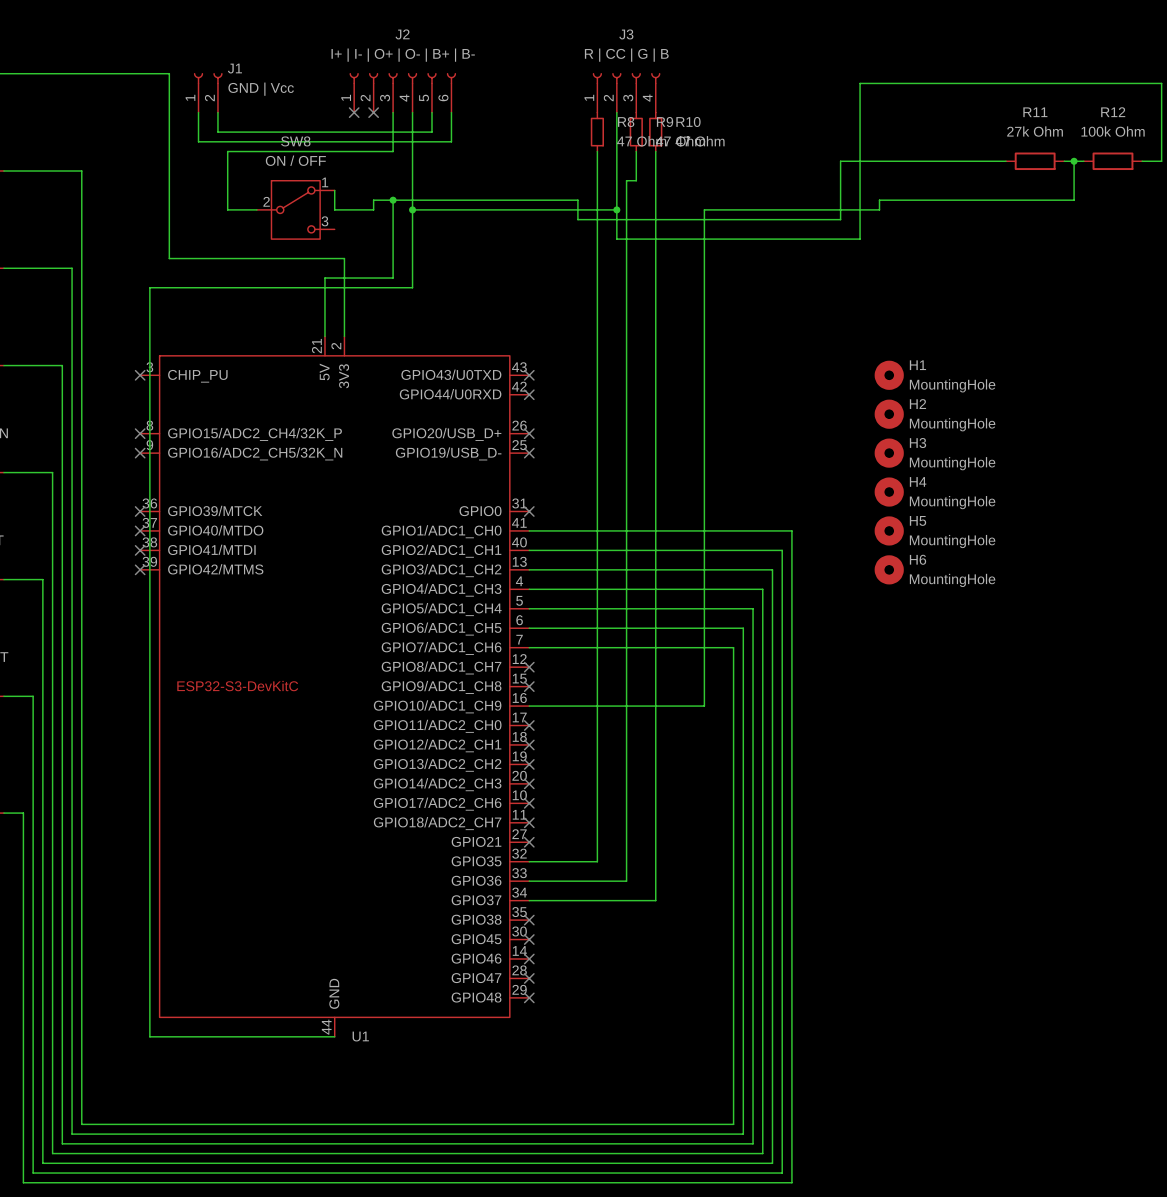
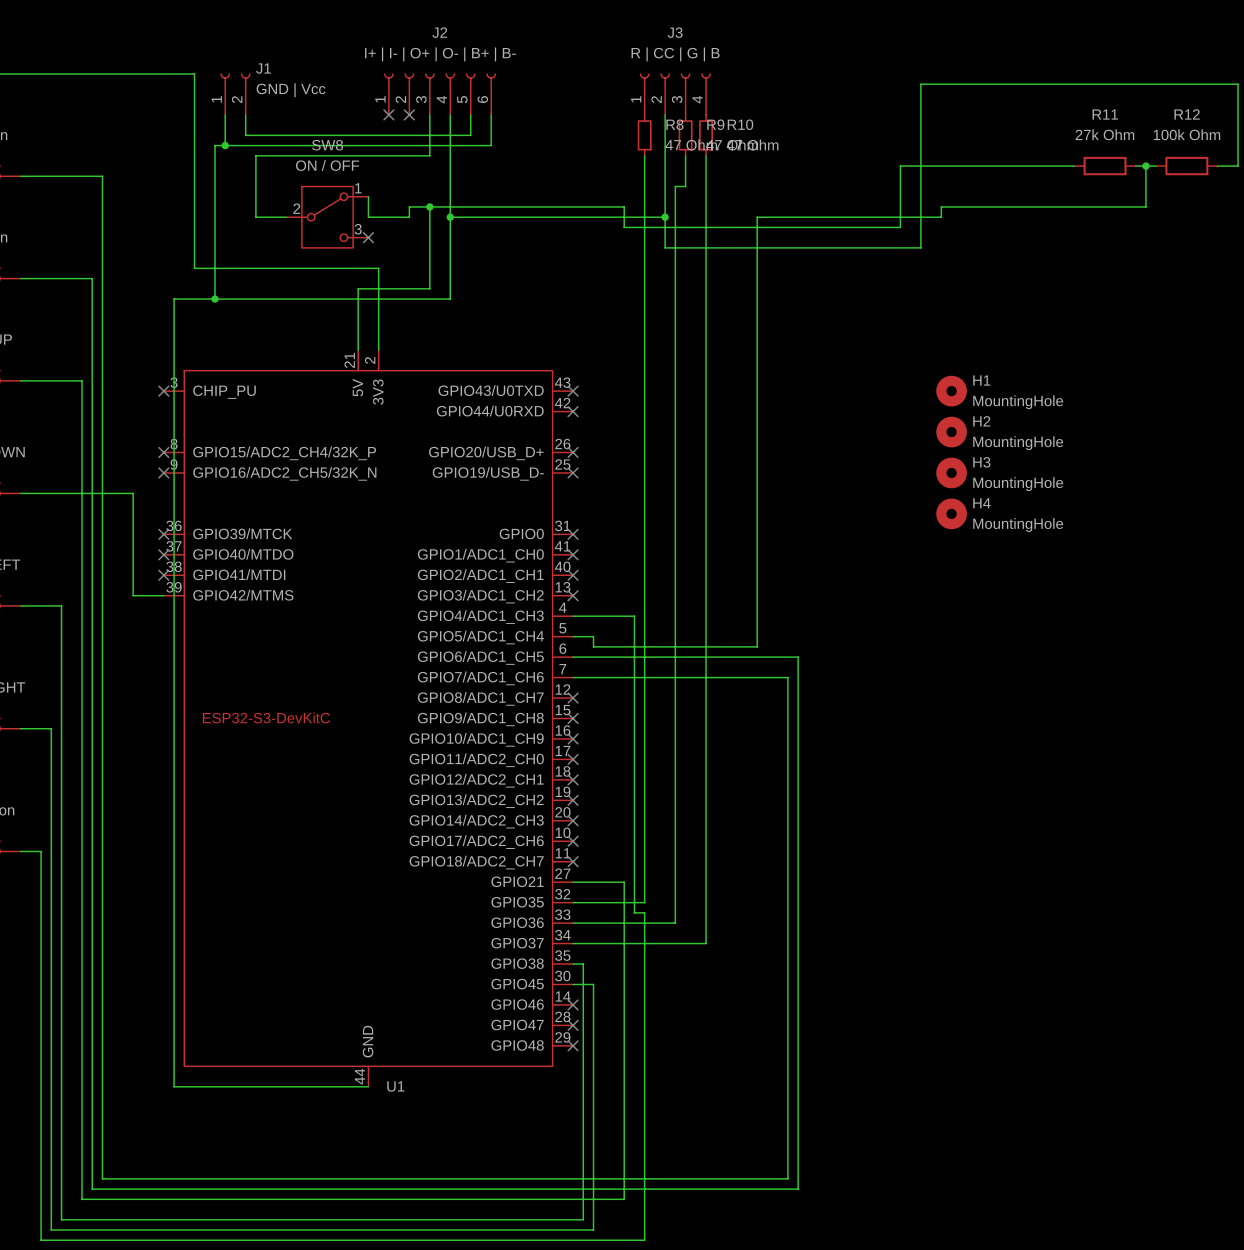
wire: none -> (225, 145) (214, 145) (214, 299)
junction: none -> (225, 145)
no-connect mark: none -> (368, 237)
junction: none -> (214, 299)
wire: (52, 472) (52, 1153) (762, 1153) (762, 589) (587, 589) -> (71, 493) (133, 493) (133, 595) (163, 595)
wire: (529, 530) (791, 530) (791, 1182) (597, 1182) -> (634, 616) (634, 912) (644, 912) (644, 1240)
no-connect mark: none -> (573, 554)
H5: MountingHole (889, 530) -> none
wire: (529, 550) (782, 550) (782, 1173) (548, 1173) -> (573, 984) (593, 984) (593, 1230)
no-connect mark: none -> (573, 575)
no-connect mark: (140, 569) -> none
wire: (529, 569) (772, 569) (772, 1163) (539, 1163) -> (573, 964) (583, 964) (583, 1219)
no-connect mark: none -> (573, 595)
H6: MountingHole (889, 569) -> none
wire: (548, 608) (753, 608) (753, 1143) (577, 1143) -> (573, 882) (624, 882) (624, 1199)
wire: (704, 618) (704, 706) (529, 706) -> (757, 646) (593, 646) (593, 636)
no-connect mark: none -> (573, 738)
no-connect mark: (529, 842) -> none
no-connect mark: (529, 920) -> none
no-connect mark: (529, 939) -> none

